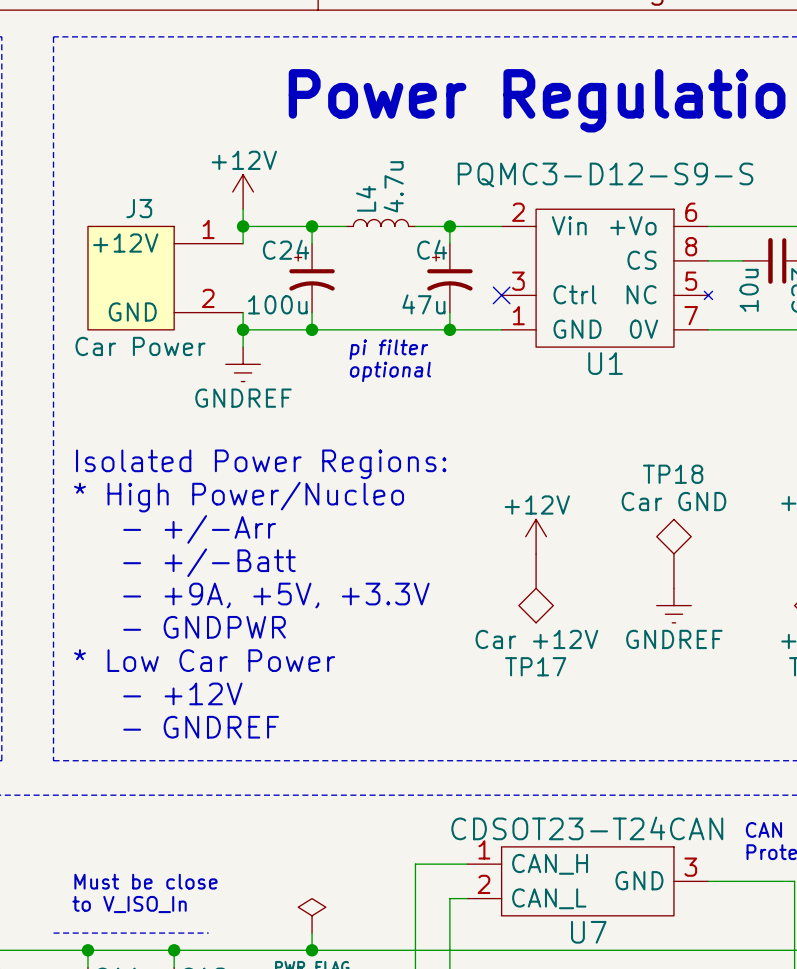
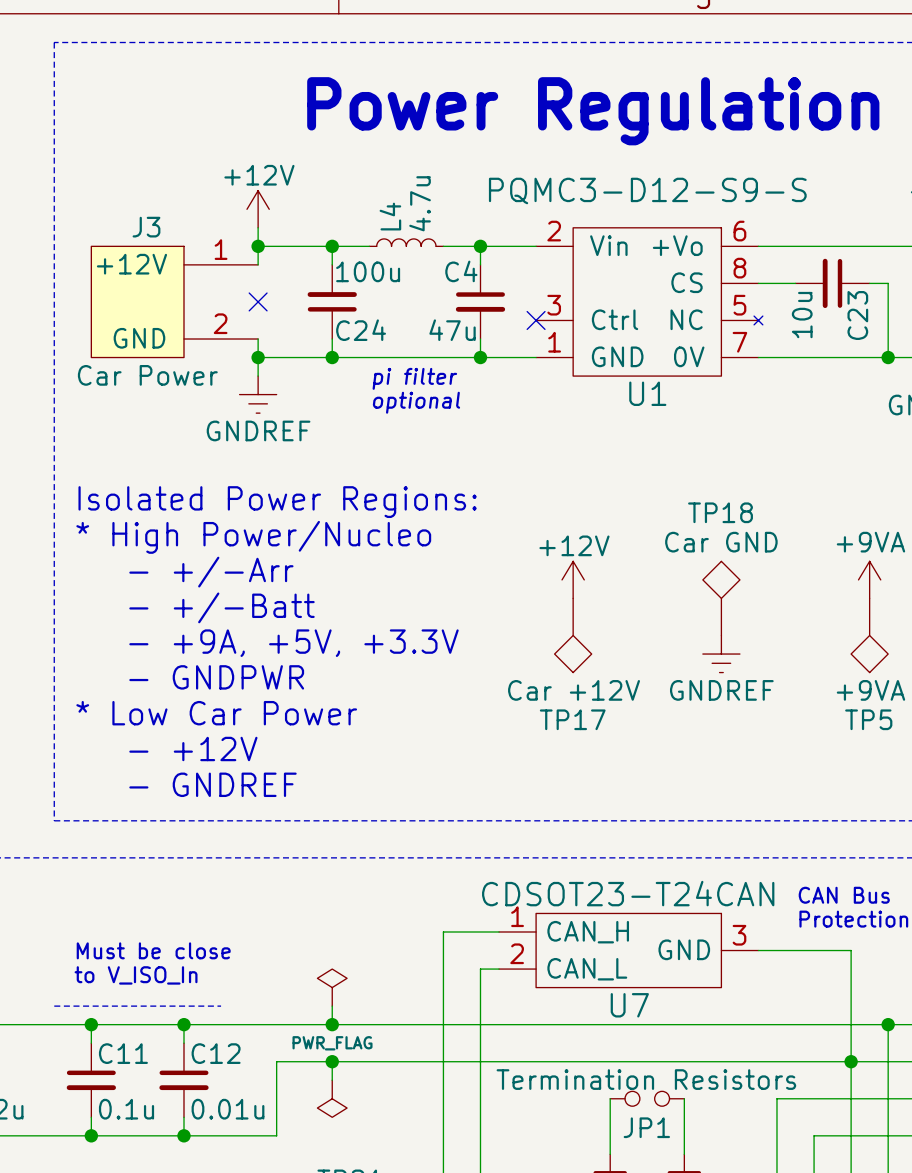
C24 symbol: [289, 243, 335, 313] -> [307, 264, 357, 340]
C4 symbol: [427, 243, 473, 313] -> [455, 264, 506, 340]
C24 name position: C24 (286, 249) -> C24 (361, 330)
no-connect mark: none -> (258, 301)
C24 value position: 100u (277, 304) -> 100u (368, 271)

